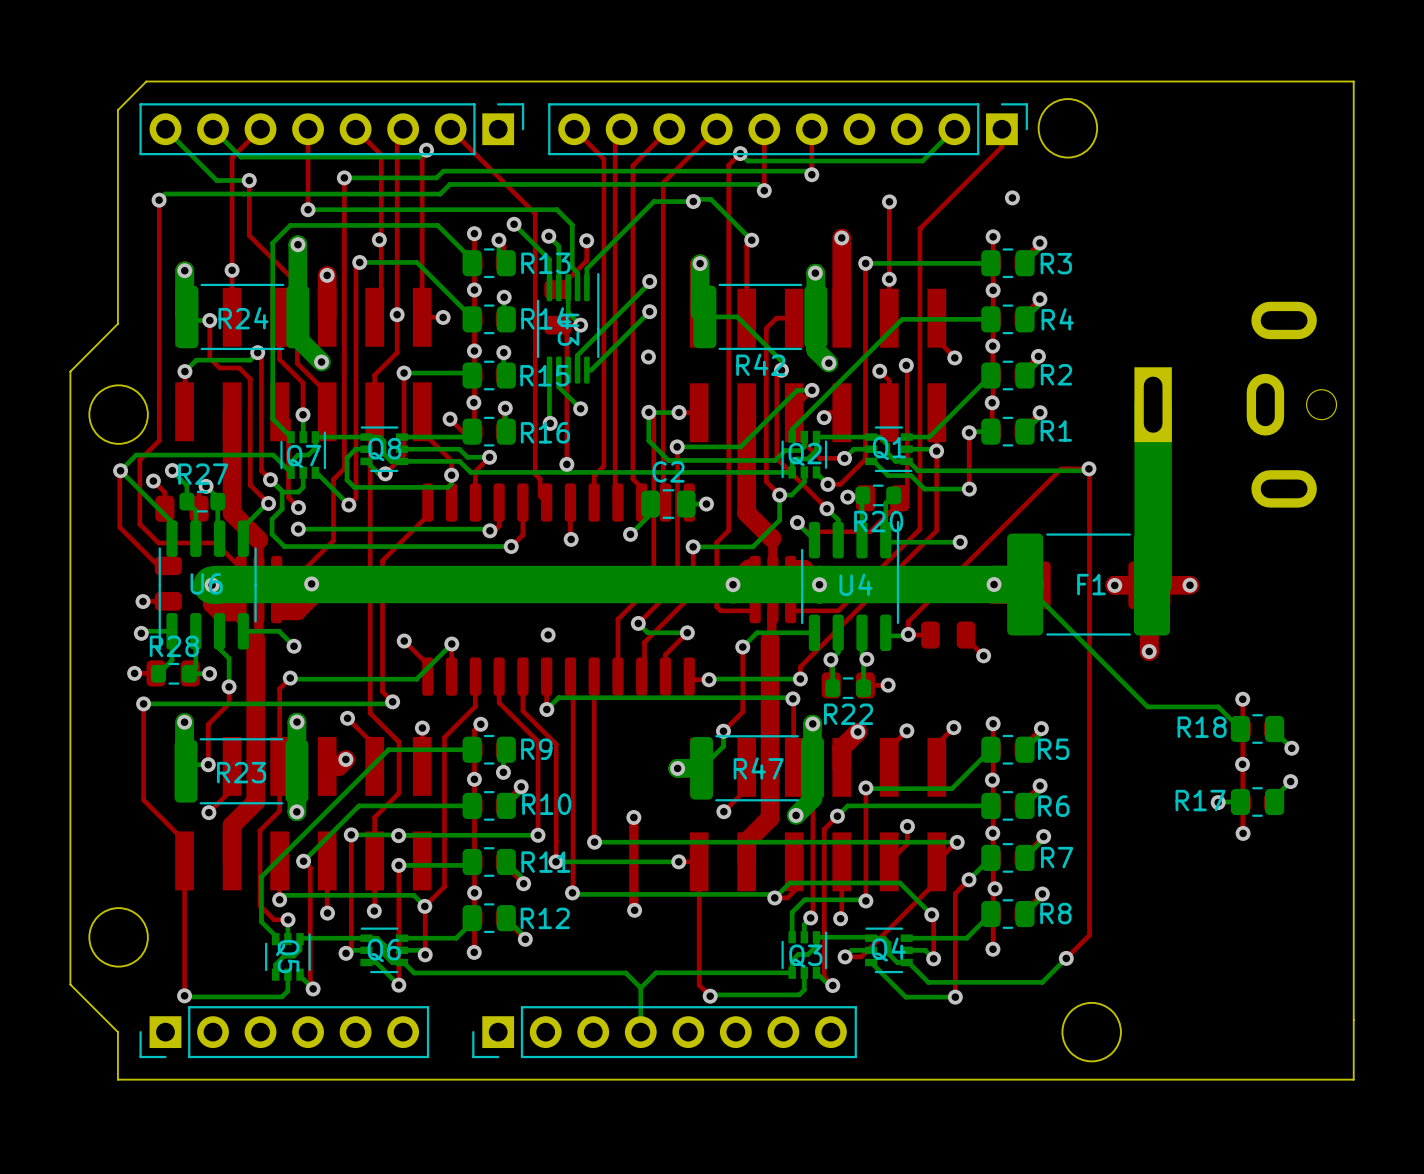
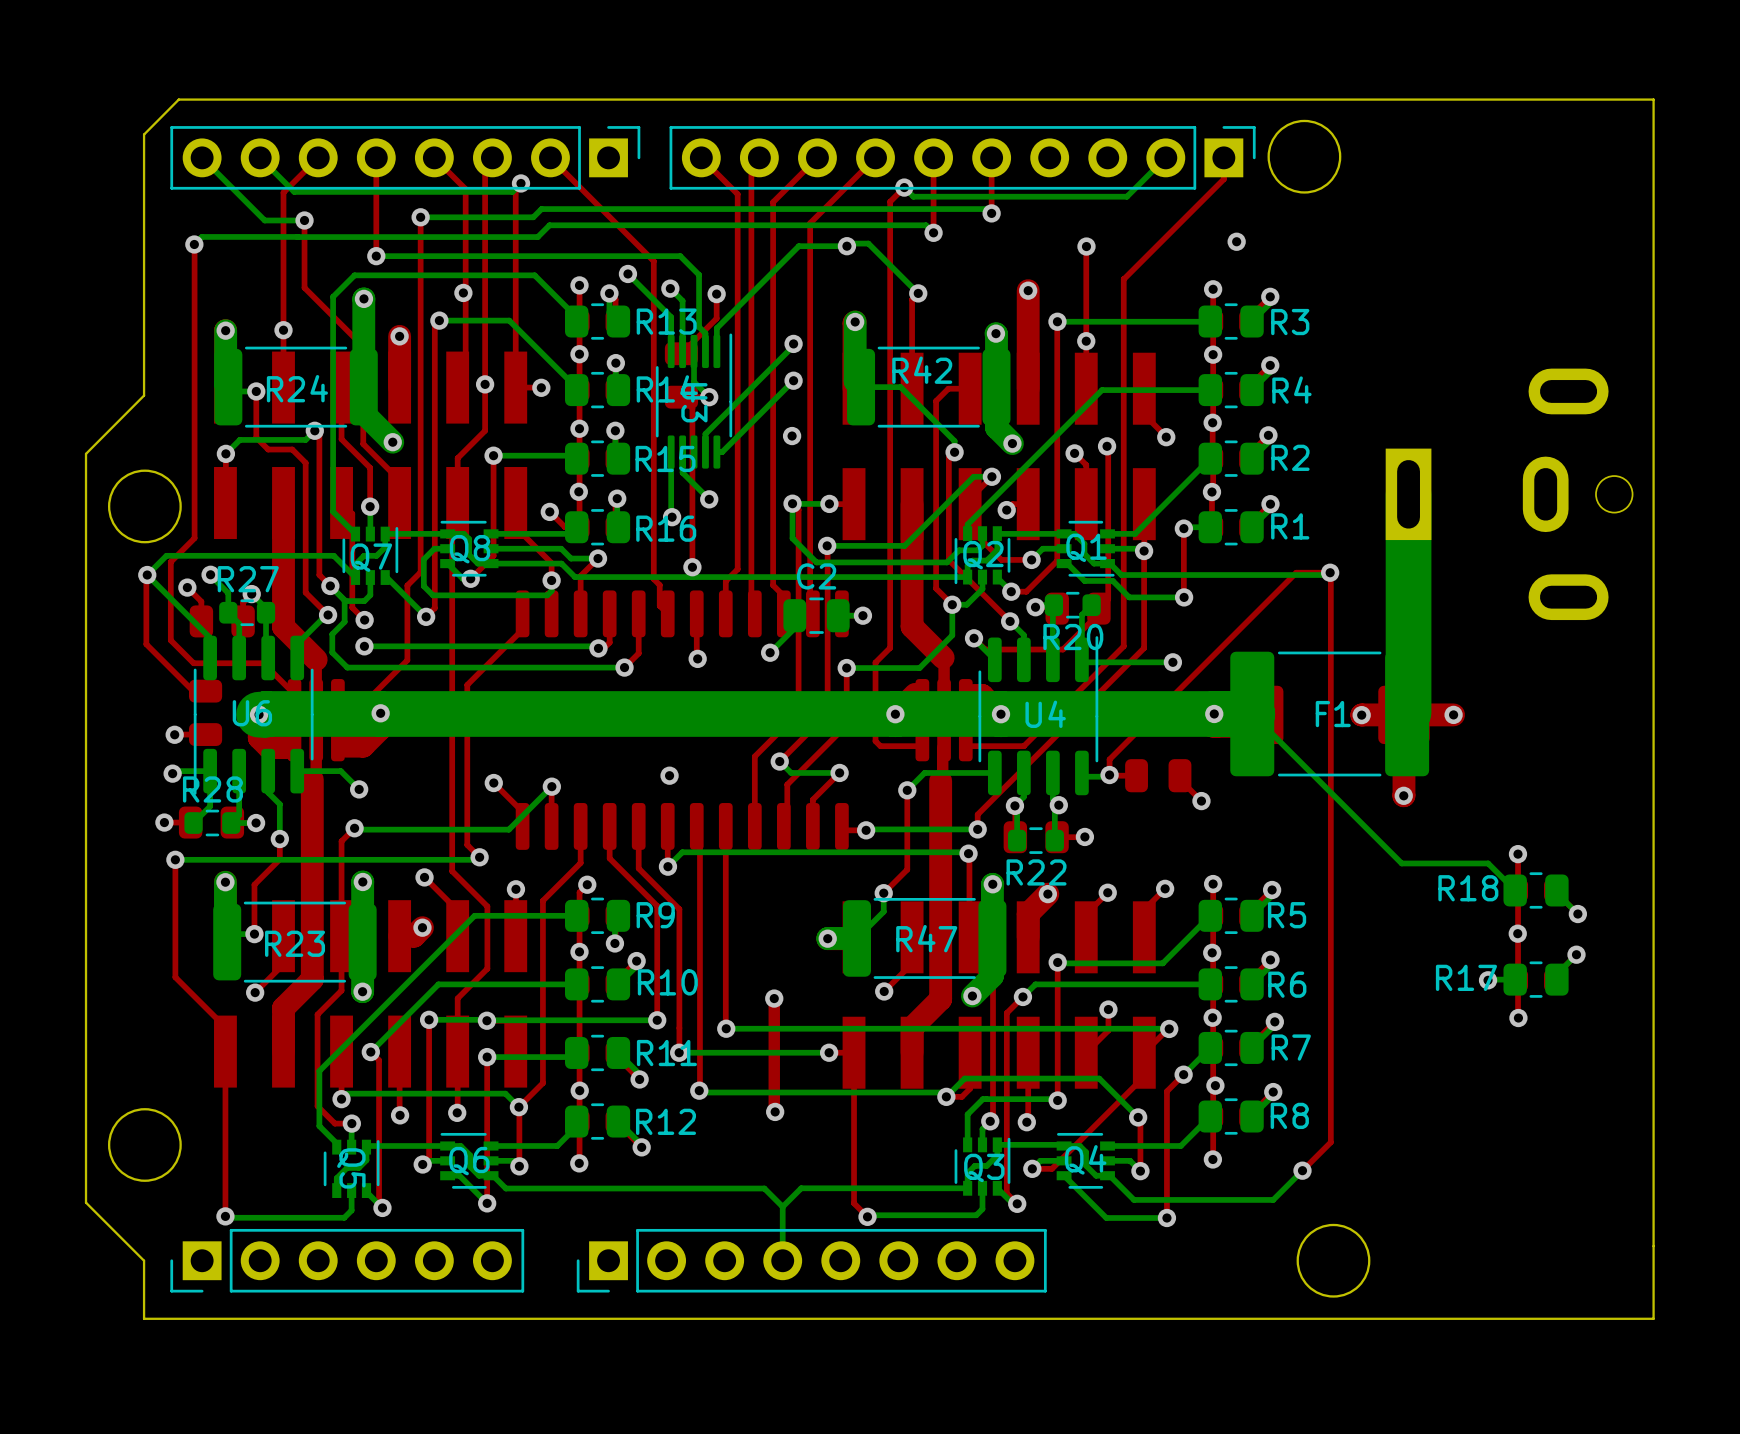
R42 name position: R42 (760, 364) -> R42 (922, 370)

